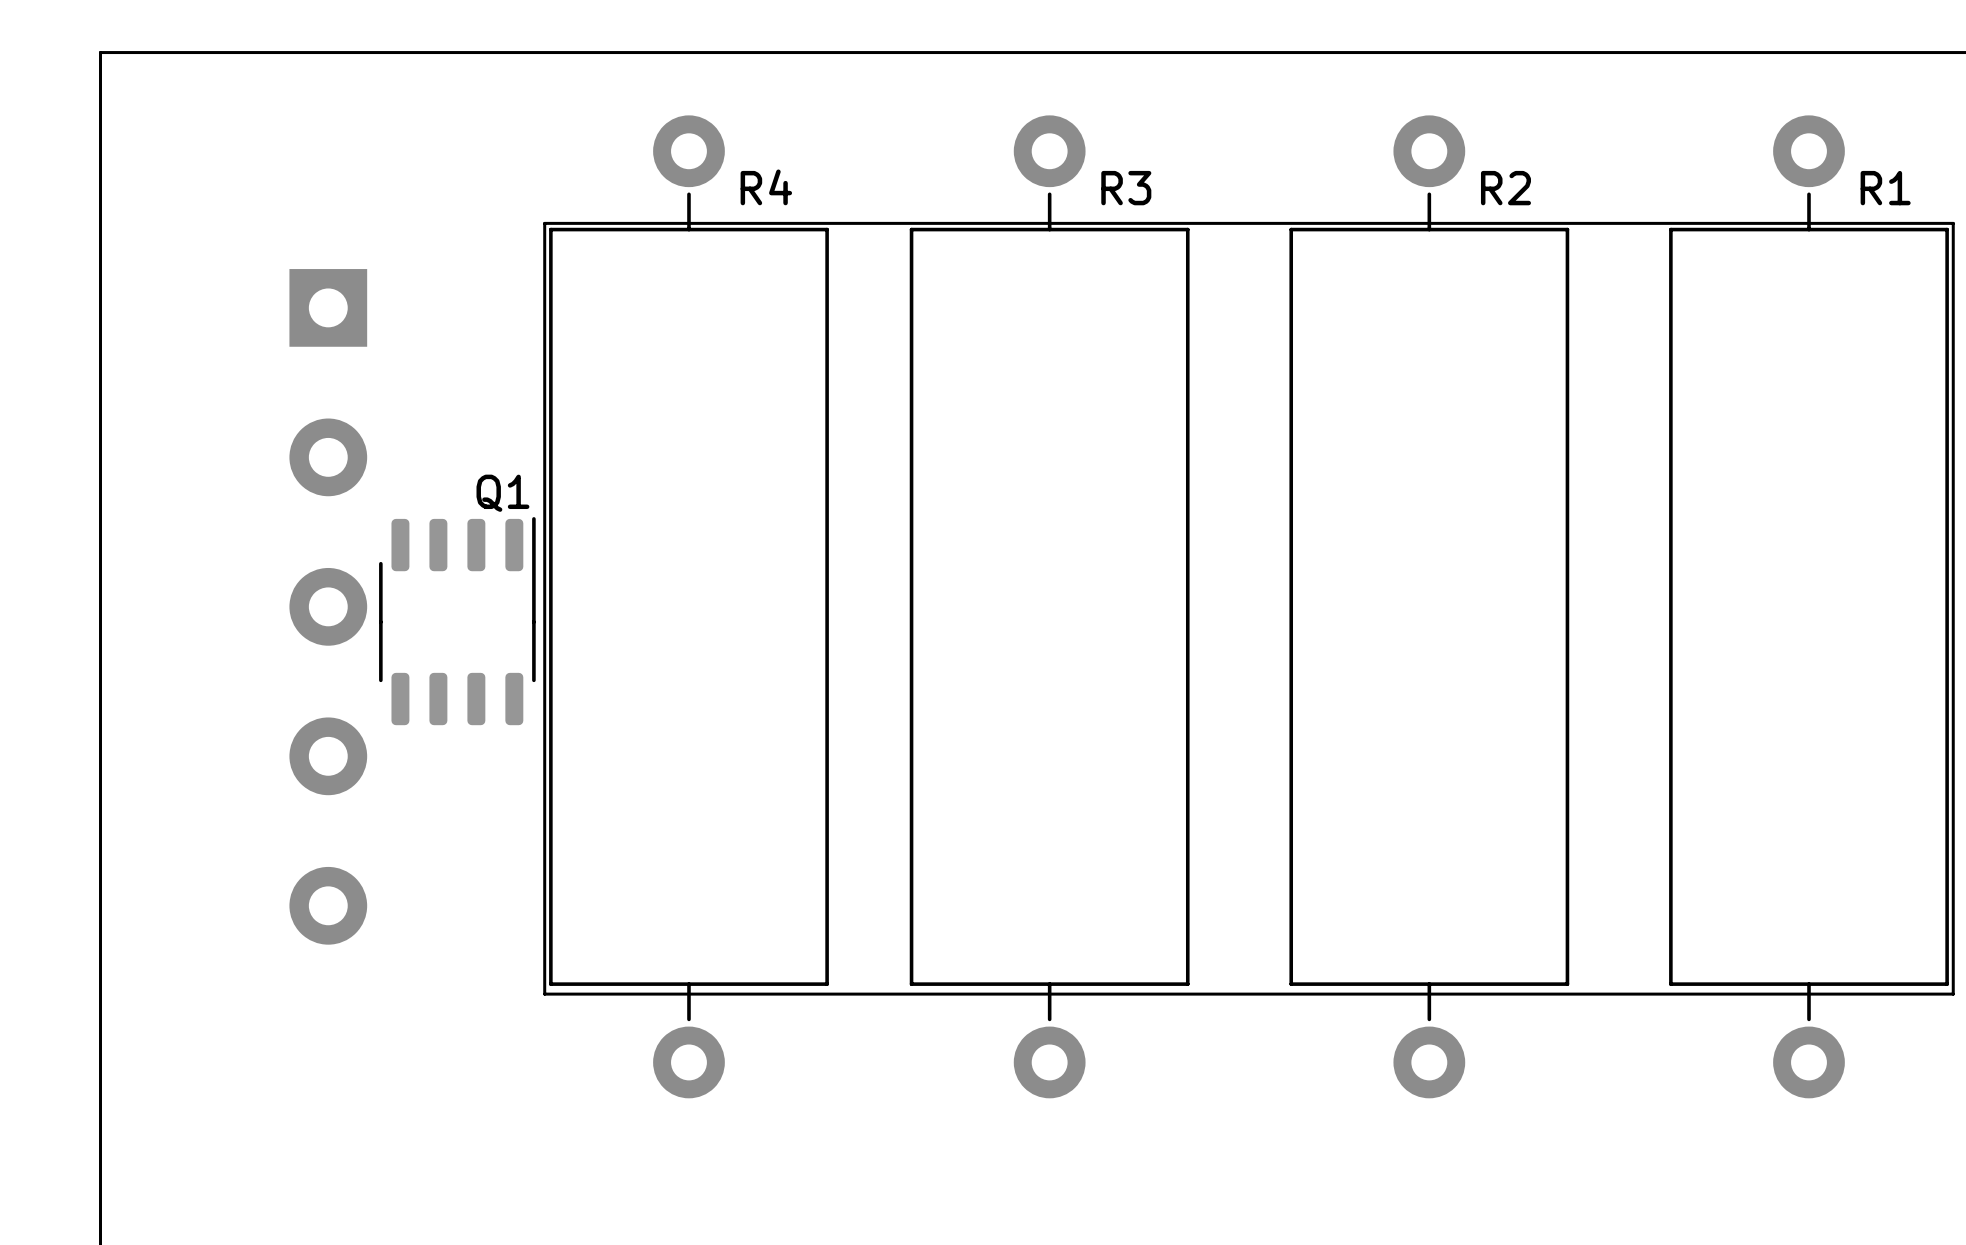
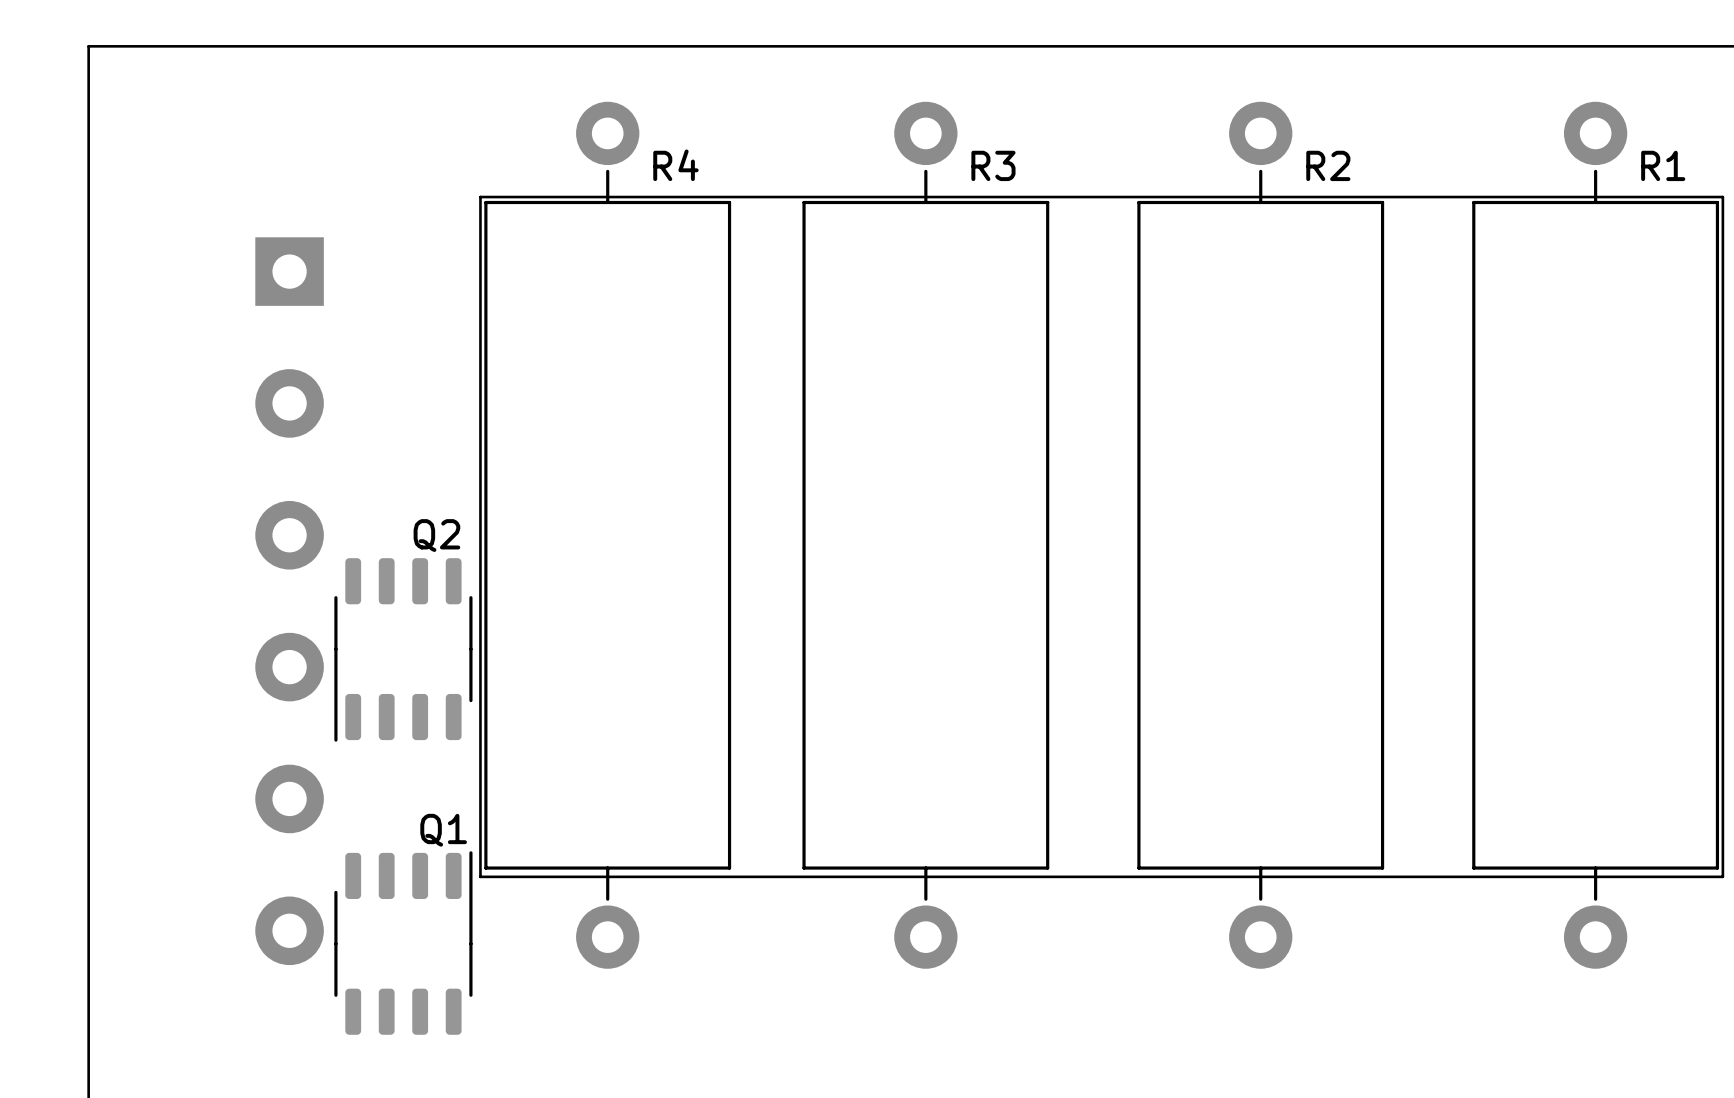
Q1 position: (457, 621) -> (403, 943)
part: none -> (289, 601)
Q2: none -> (403, 649)

